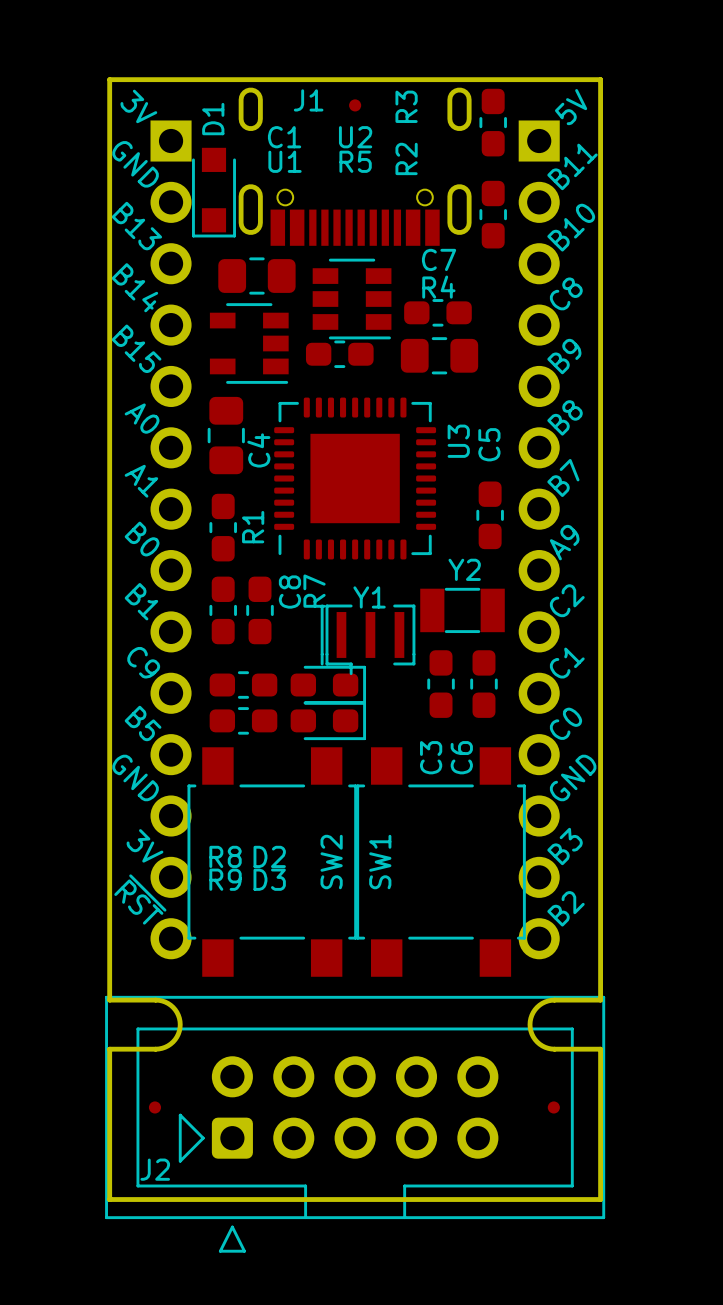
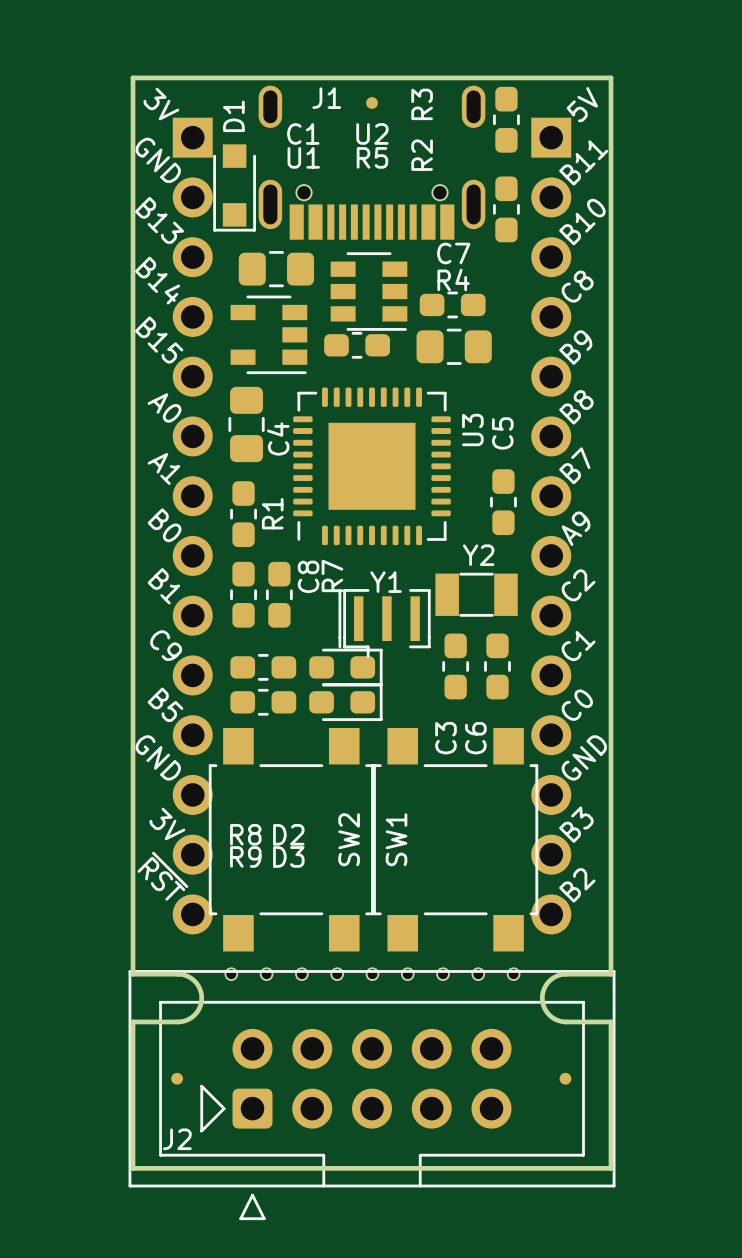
part: none -> (231, 974)
part: none -> (266, 974)
part: none -> (301, 974)
part: none -> (337, 974)
part: none -> (372, 974)
part: none -> (407, 974)
part: none -> (443, 974)
part: none -> (478, 974)
part: none -> (513, 974)

